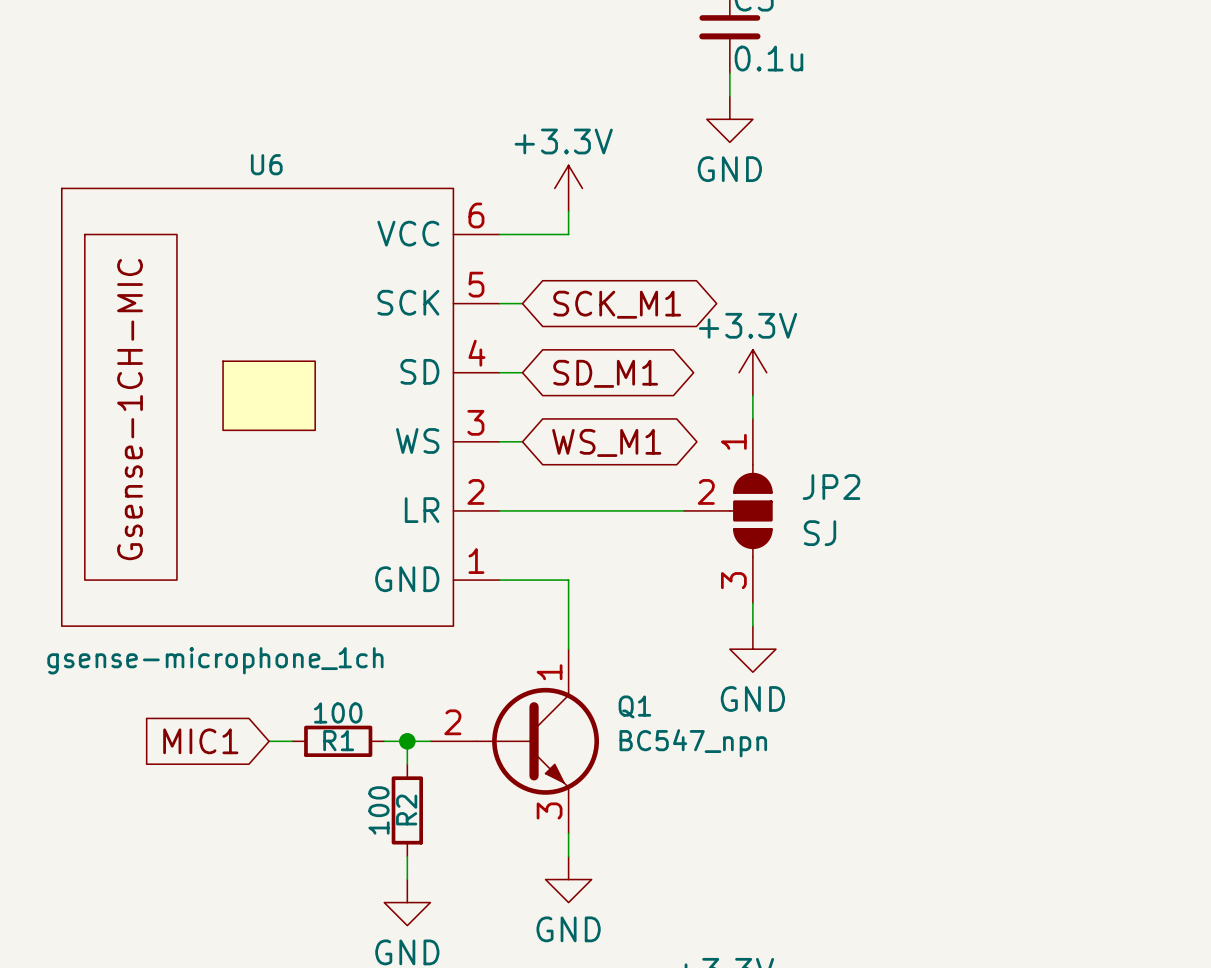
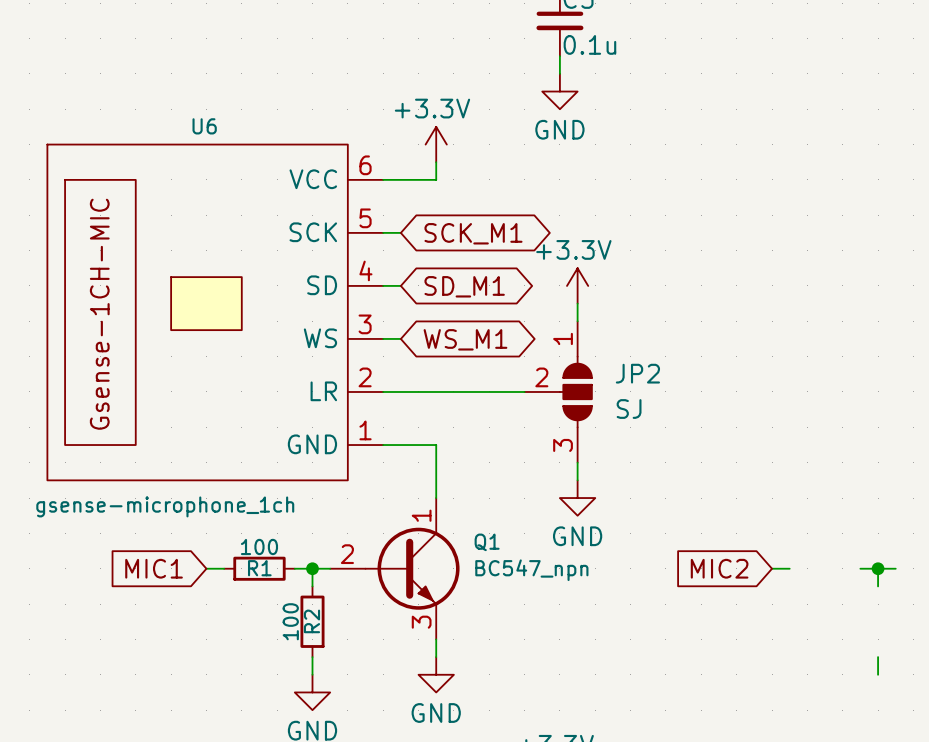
global label: none -> MIC2 (719, 568)
wire: none -> (772, 568) (789, 568)
wire: none -> (860, 568) (895, 568)
wire: none -> (878, 568) (878, 586)
junction: none -> (878, 568)
wire: none -> (878, 657) (878, 674)

